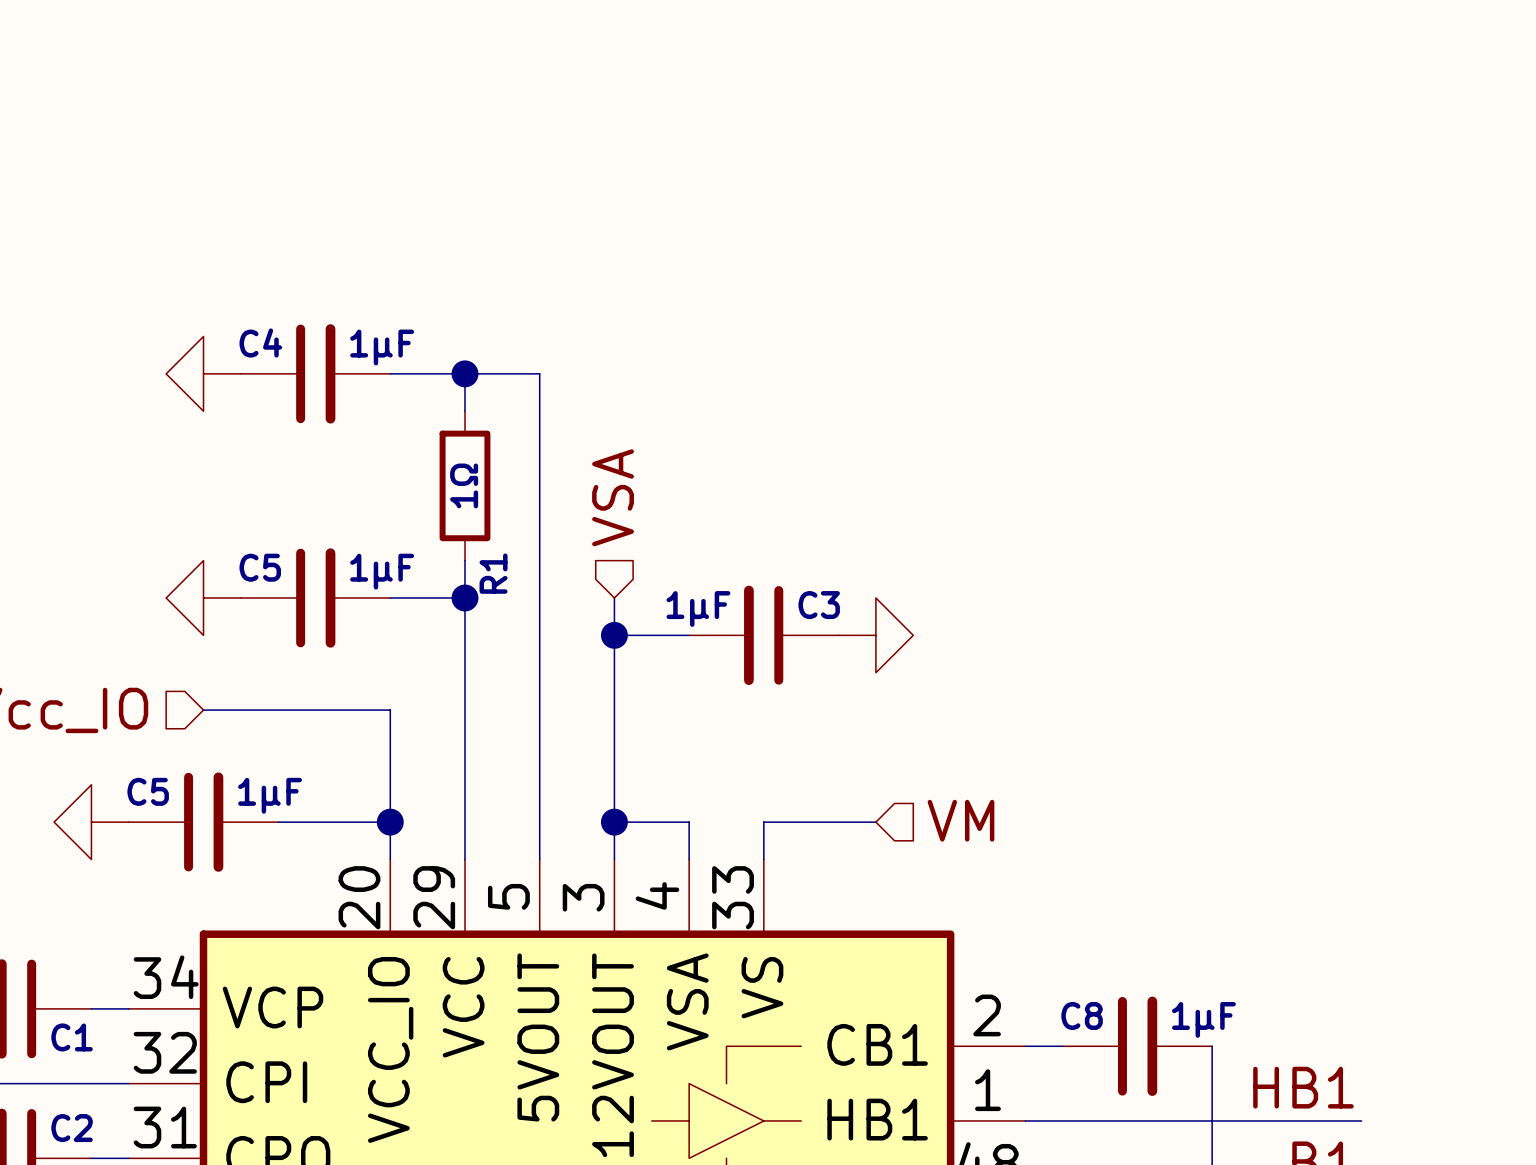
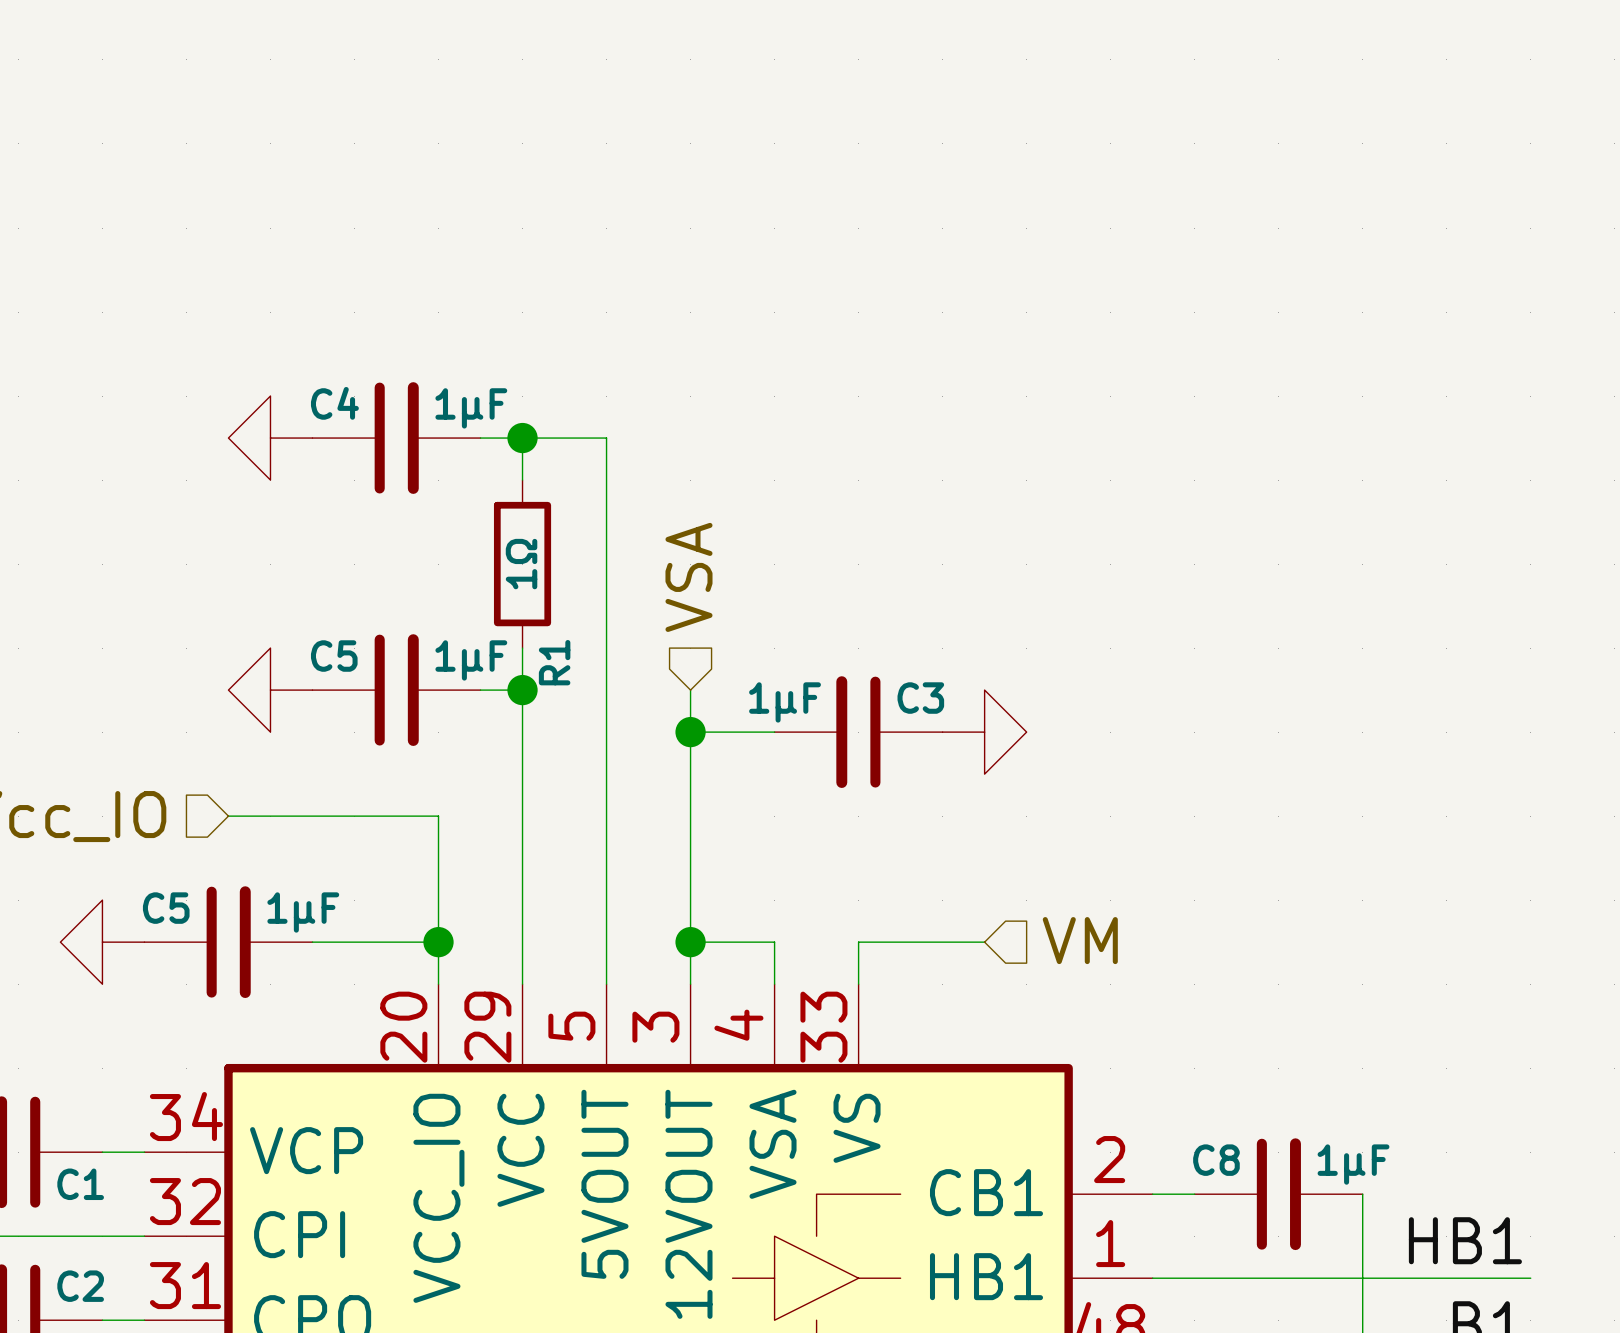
power symbol position: (203, 373) -> (270, 438)
C4 position: (315, 373) -> (396, 438)
power symbol position: (203, 598) -> (270, 690)
C5 position: (315, 598) -> (396, 690)

